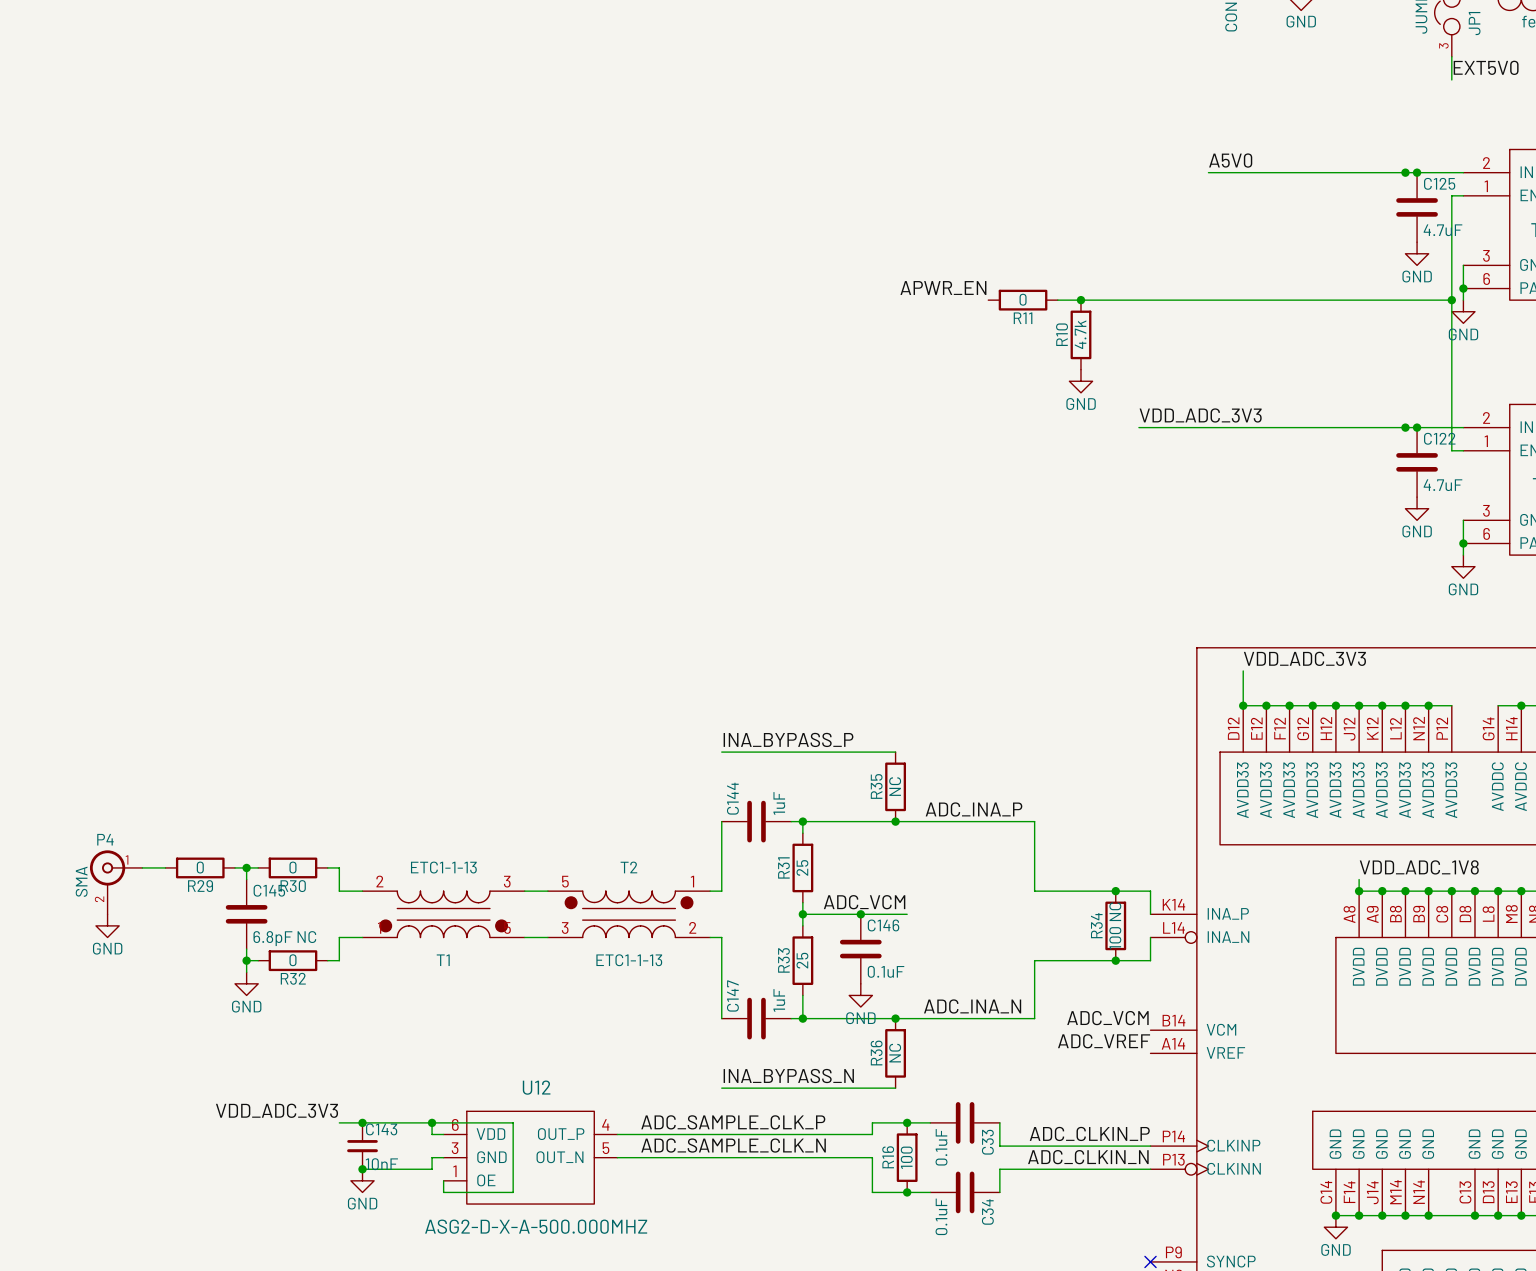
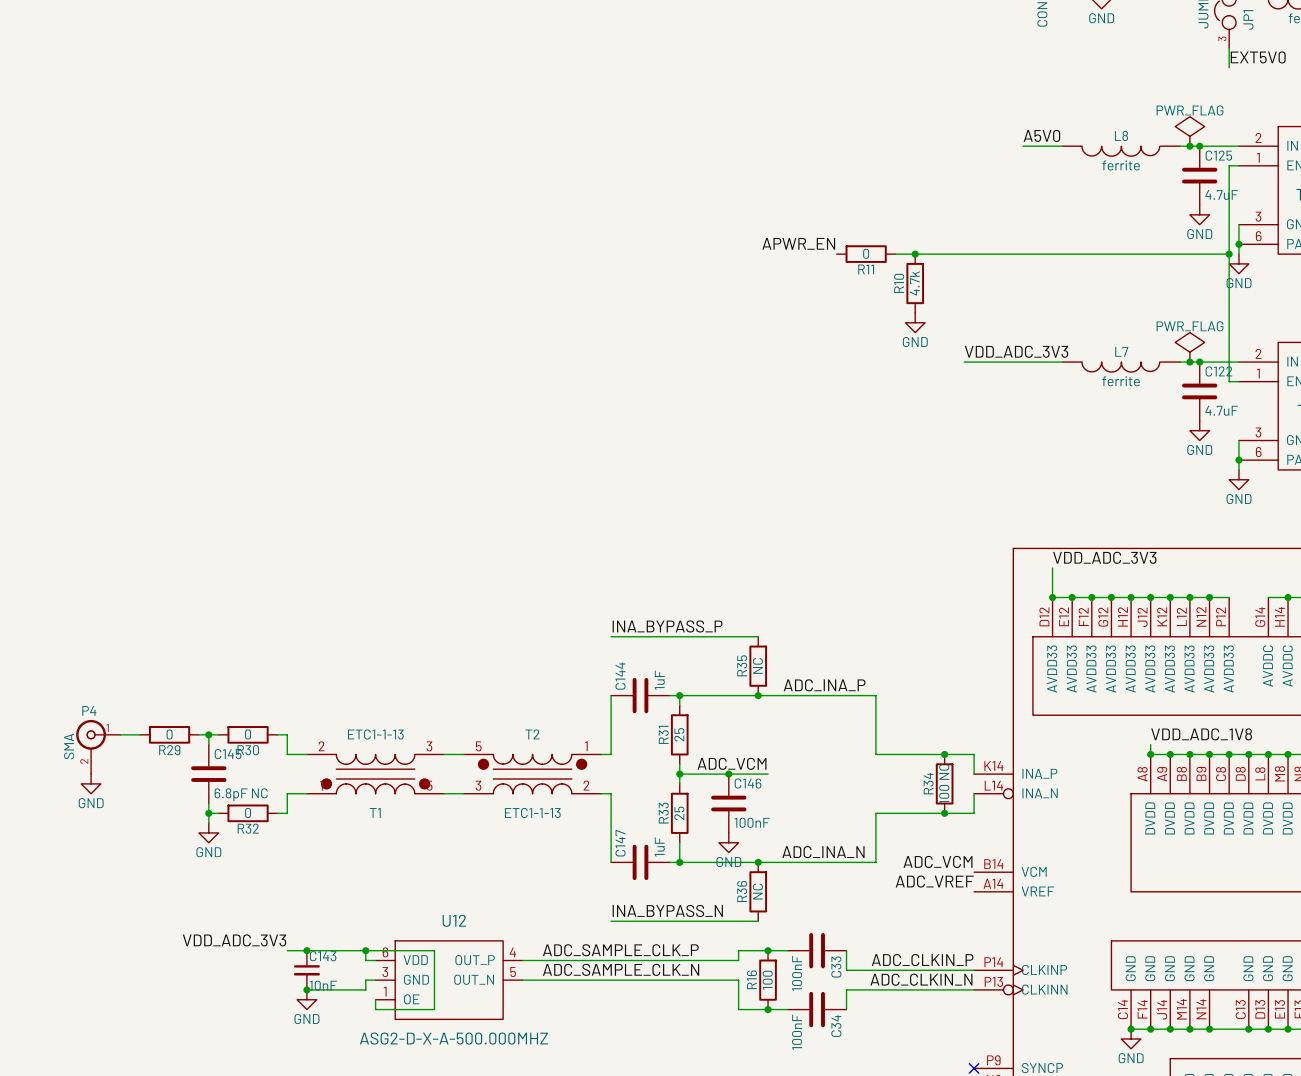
power symbol: none -> PWR_FLAG (1189, 131)
wire: (1254, 172) (1393, 172) -> none
L8: none -> ferrite (1121, 151)
power symbol: none -> PWR_FLAG (1189, 347)
wire: (1254, 427) (1393, 427) -> none
L7: none -> ferrite (1121, 367)
C146 value: 0.1uF (886, 971) -> 100nF (752, 822)
C33 value: 0.1uF (941, 1147) -> 100nF (797, 973)
C34 value: 0.1uF (941, 1216) -> 100nF (797, 1032)

